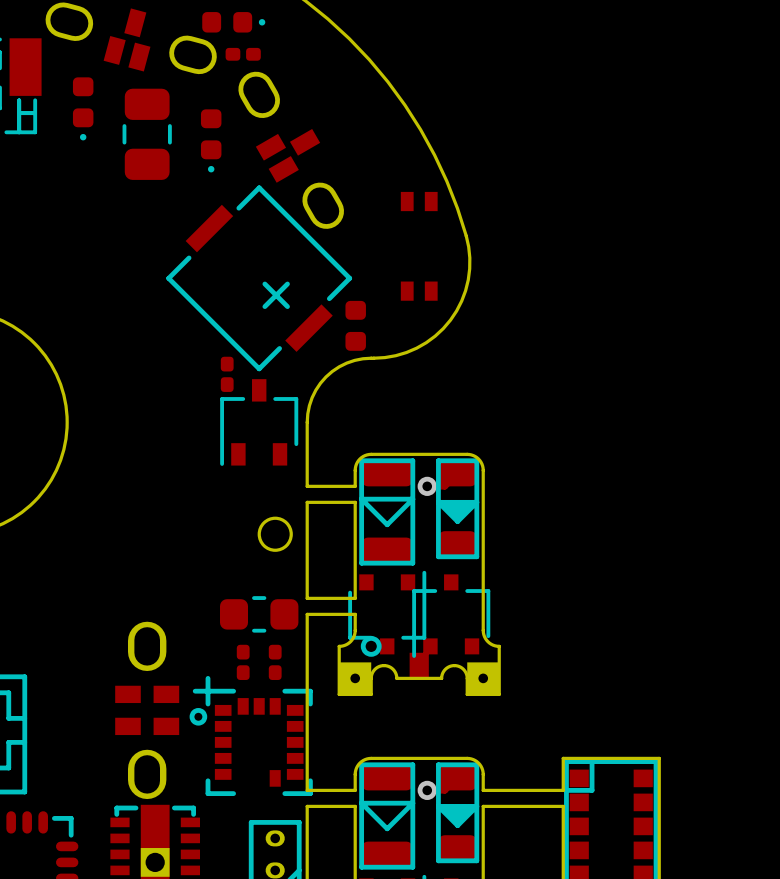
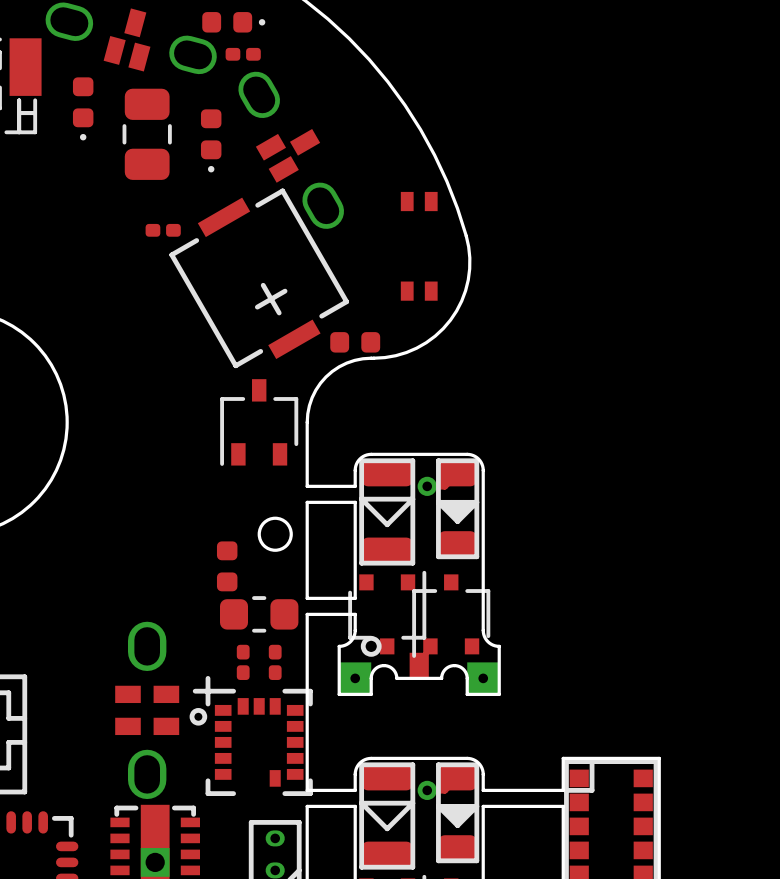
part rotation: 0° (259, 278) -> 15° clockwise (259, 278)
part rotation: 0° (355, 325) -> 90° clockwise (355, 342)
part rotation: 0° (227, 374) -> 90° clockwise (163, 230)
part position: (227, 374) -> (163, 230)
part: none -> (227, 566)

